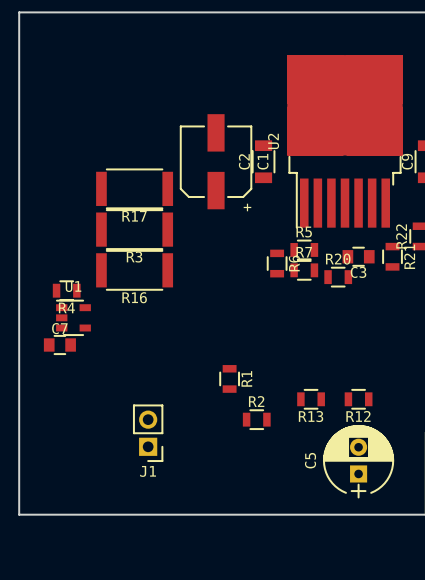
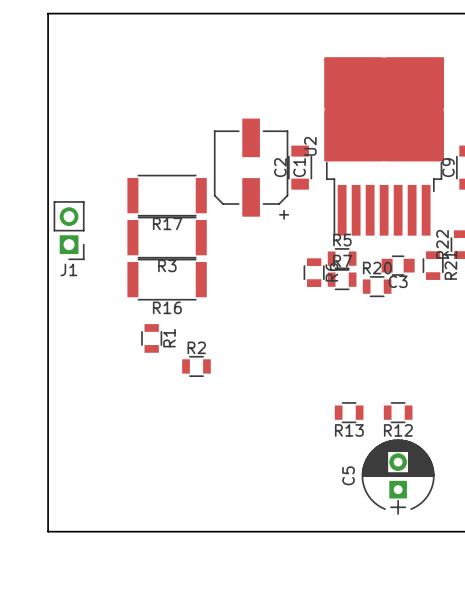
R4: (66, 290) -> none
U1: (73, 317) -> none
C7: (59, 344) -> none
R1 position: (229, 378) -> (151, 338)
R2 position: (256, 419) -> (196, 366)
J1 position: (148, 433) -> (69, 230)

